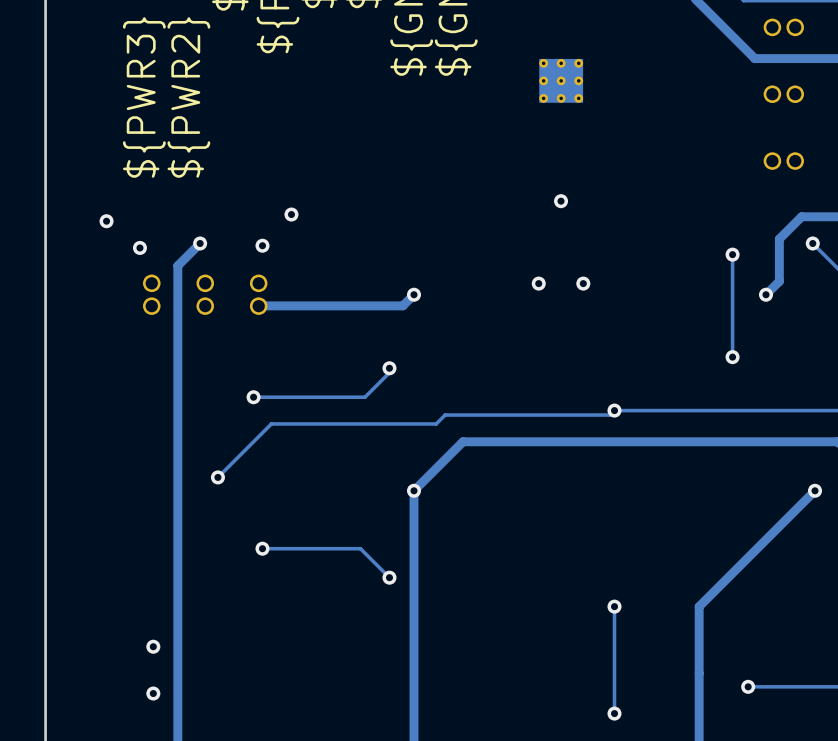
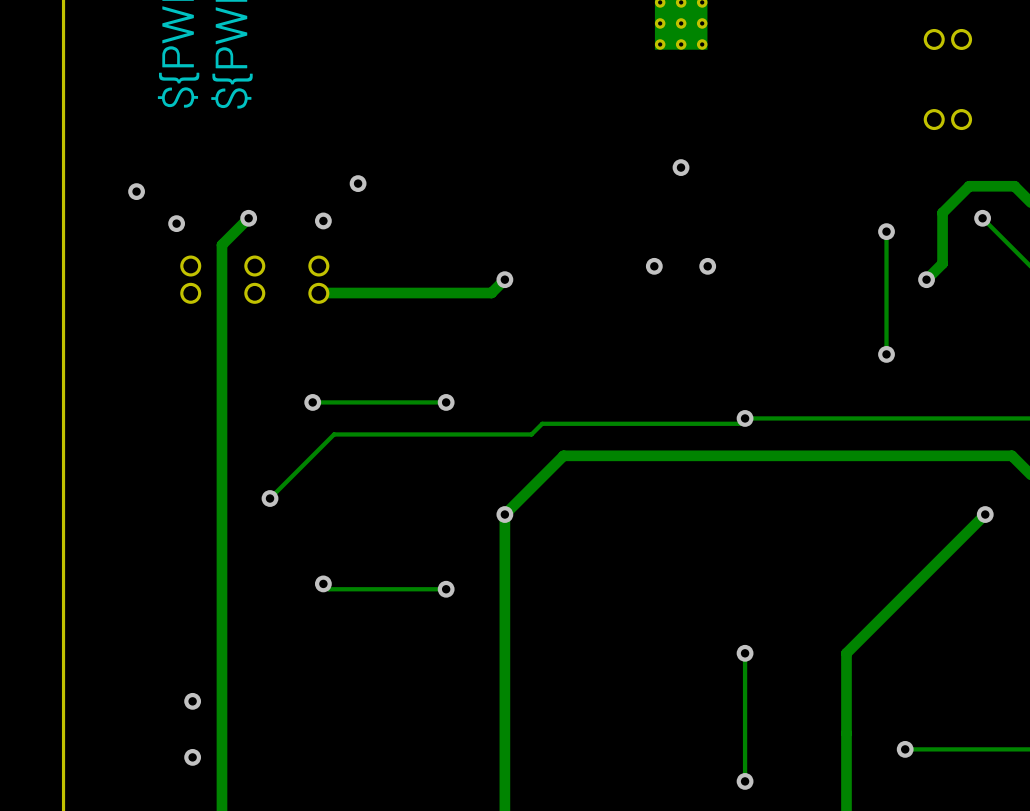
track: (389, 368) (389, 372) (364, 397) -> none
via position: (389, 368) -> (446, 402)
track: (262, 548) (360, 548) (389, 577) -> (323, 583) (328, 589) (446, 589)
via position: (389, 577) -> (446, 589)

